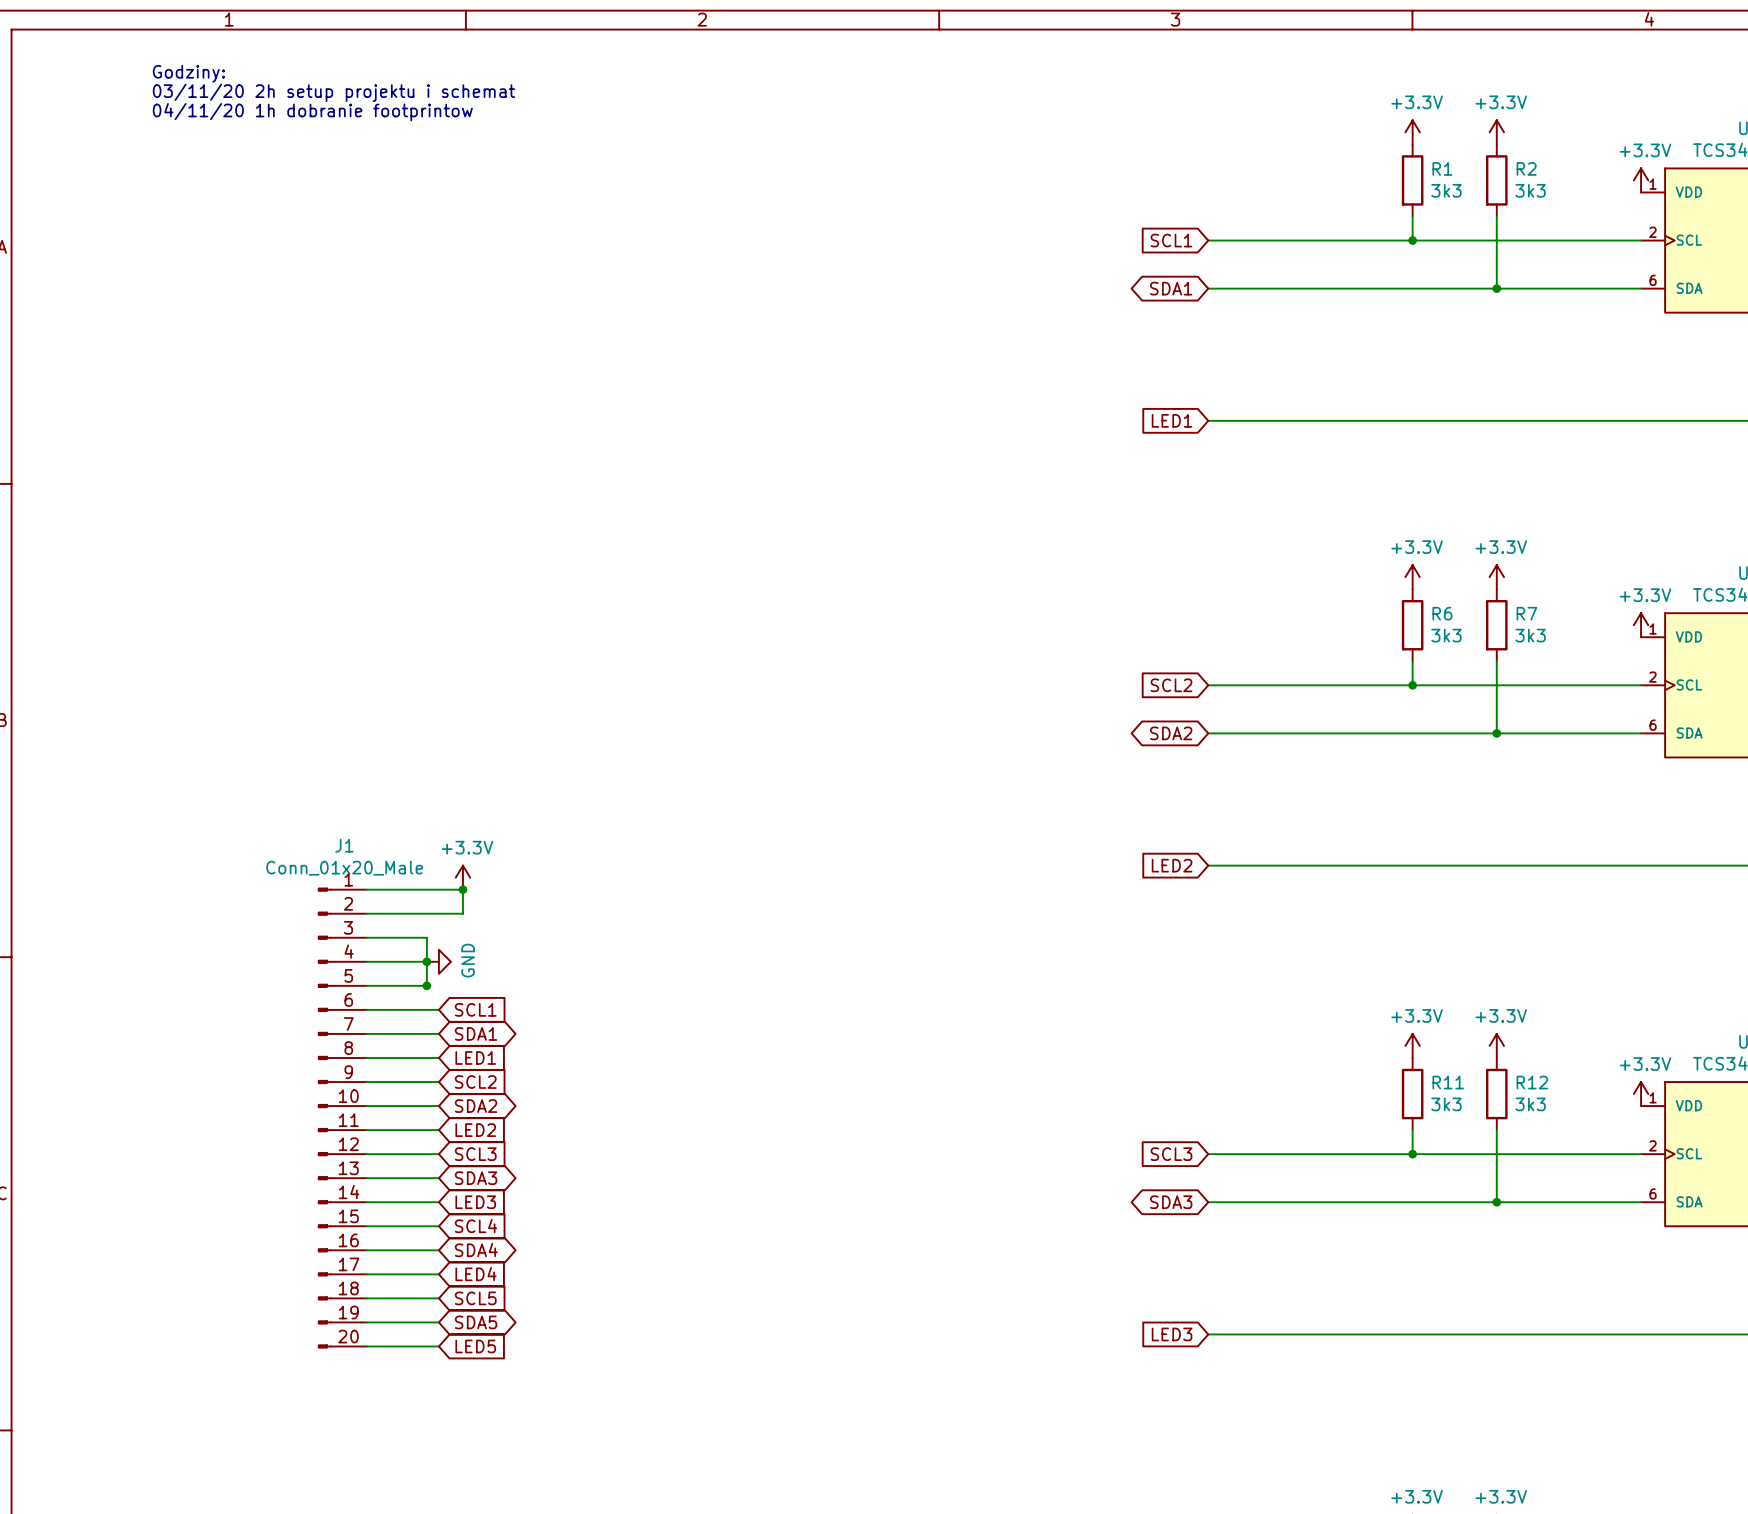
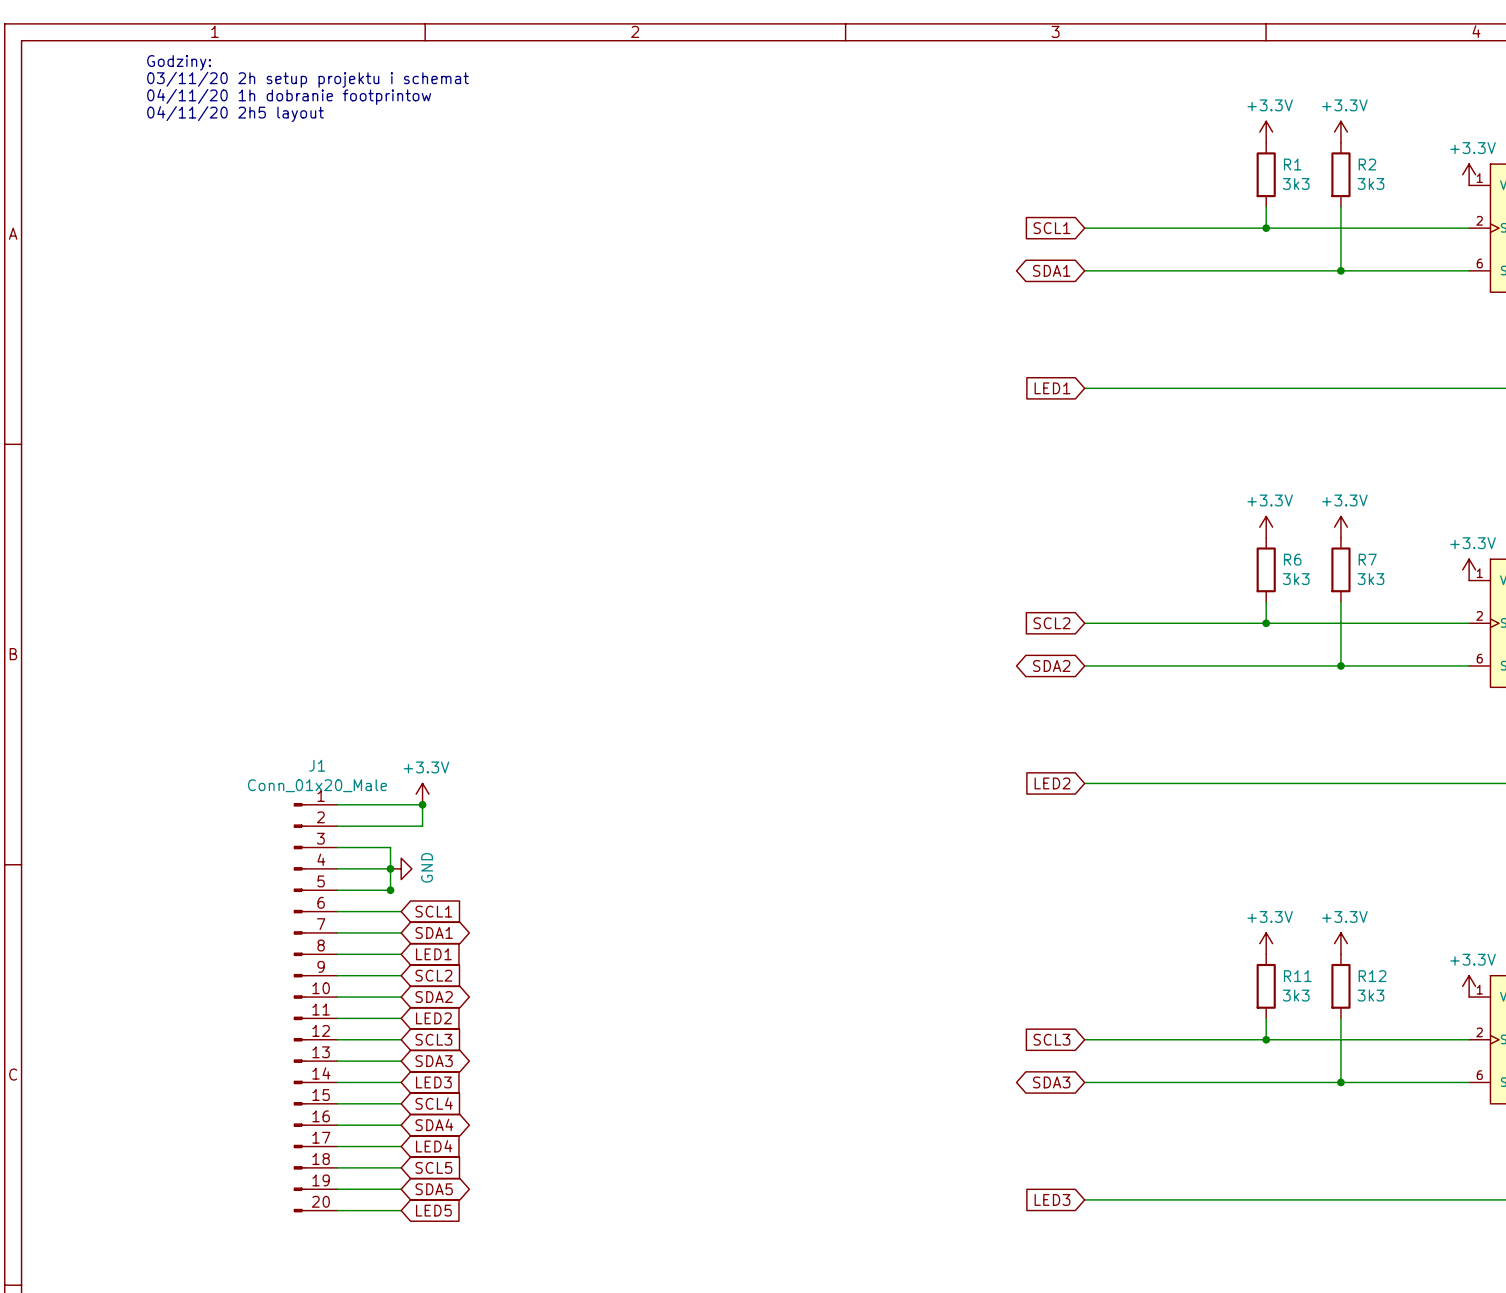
text: none -> Godziny: (179, 62)
text: Godziny: (188, 73) -> 03/11/20 2h setup projektu i schemat (307, 79)
text: 03/11/20 2h setup projektu i schemat (333, 92) -> 04/11/20 1h dobranie footprintow (289, 96)
text: 04/11/20 1h dobranie footprintow (312, 112) -> 04/11/20 2h5 layout (235, 114)

